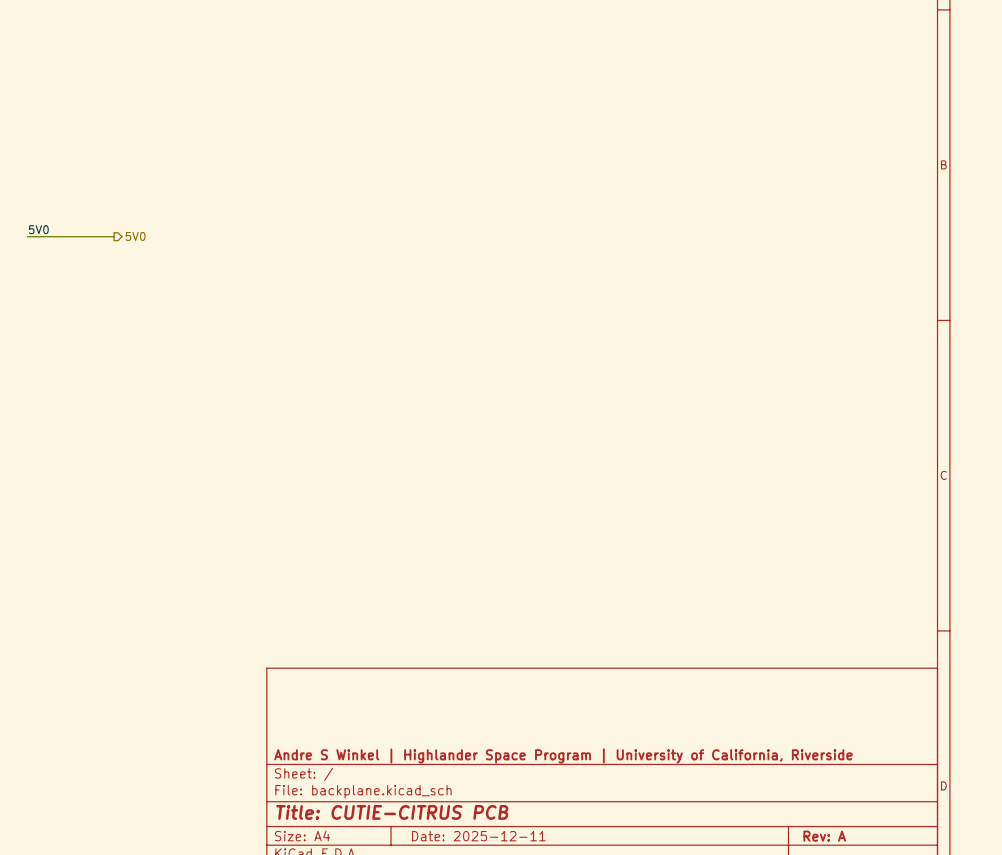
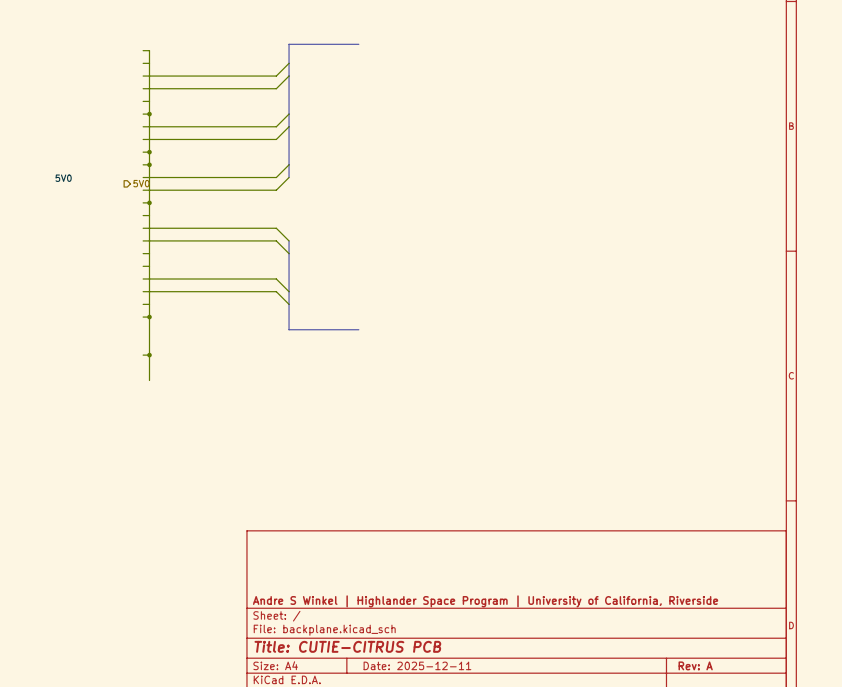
bus: none -> (358, 44) (289, 44) (289, 177)
wire: none -> (143, 50) (149, 50) (149, 380)
wire: none -> (143, 63) (149, 63)
wire: none -> (289, 63) (276, 76) (143, 76)
wire: none -> (289, 76) (276, 88) (143, 88)
wire: none -> (143, 101) (149, 101)
wire: none -> (143, 114) (149, 114)
junction: none -> (149, 114)
wire: none -> (289, 114) (276, 126) (143, 126)
wire: none -> (289, 126) (276, 139) (143, 139)
wire: none -> (143, 152) (149, 152)
junction: none -> (149, 152)
wire: none -> (143, 164) (149, 164)
junction: none -> (149, 164)
wire: none -> (289, 164) (276, 177) (143, 177)
wire: none -> (289, 177) (276, 190) (143, 190)
wire: (27, 236) (114, 236) -> none
wire: none -> (143, 202) (149, 202)
junction: none -> (149, 202)
wire: none -> (143, 215) (149, 215)
wire: none -> (143, 228) (276, 228) (289, 240)
wire: none -> (143, 240) (276, 240) (289, 253)
bus: none -> (289, 240) (289, 329) (358, 329)
wire: none -> (143, 253) (149, 253)
wire: none -> (143, 266) (149, 266)
wire: none -> (143, 279) (276, 279) (289, 291)
wire: none -> (143, 291) (276, 291) (289, 304)
wire: none -> (143, 304) (149, 304)
wire: none -> (143, 317) (149, 317)
junction: none -> (149, 317)
wire: none -> (143, 355) (149, 355)
junction: none -> (149, 355)

